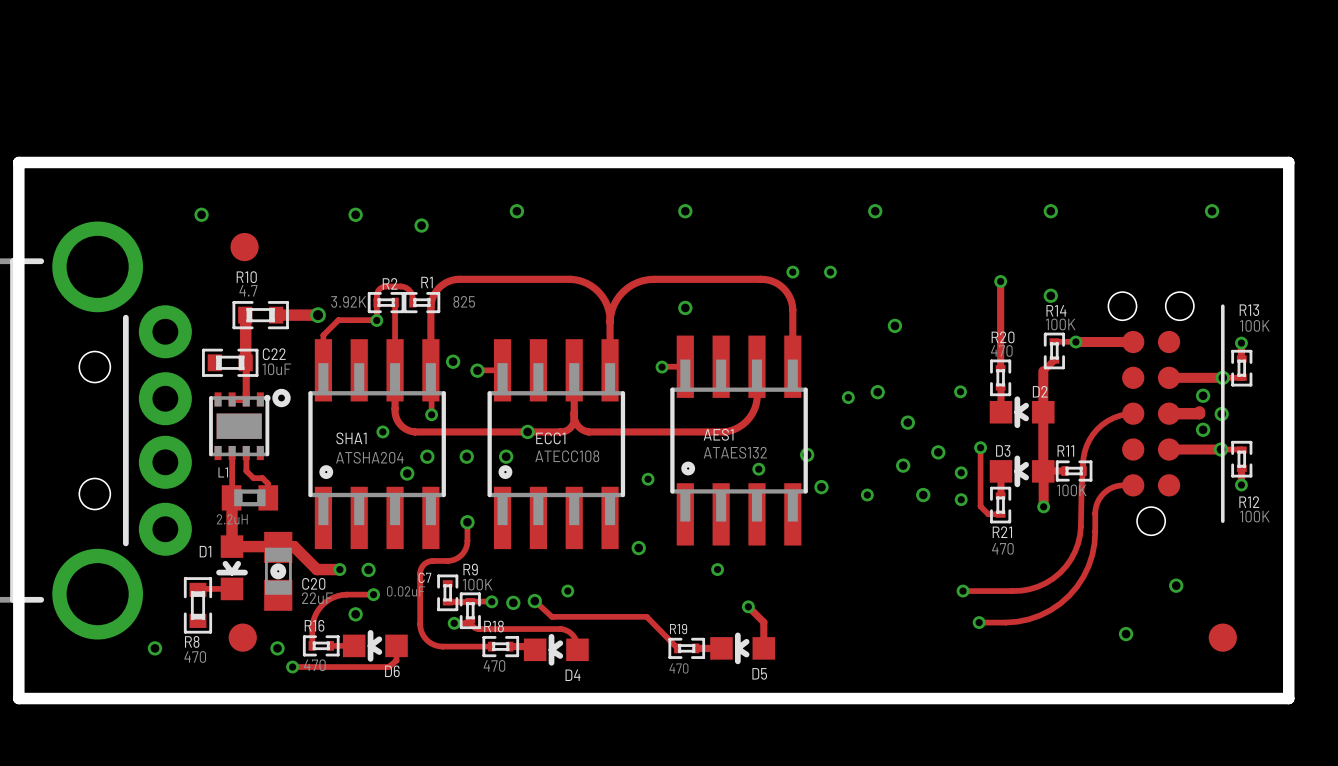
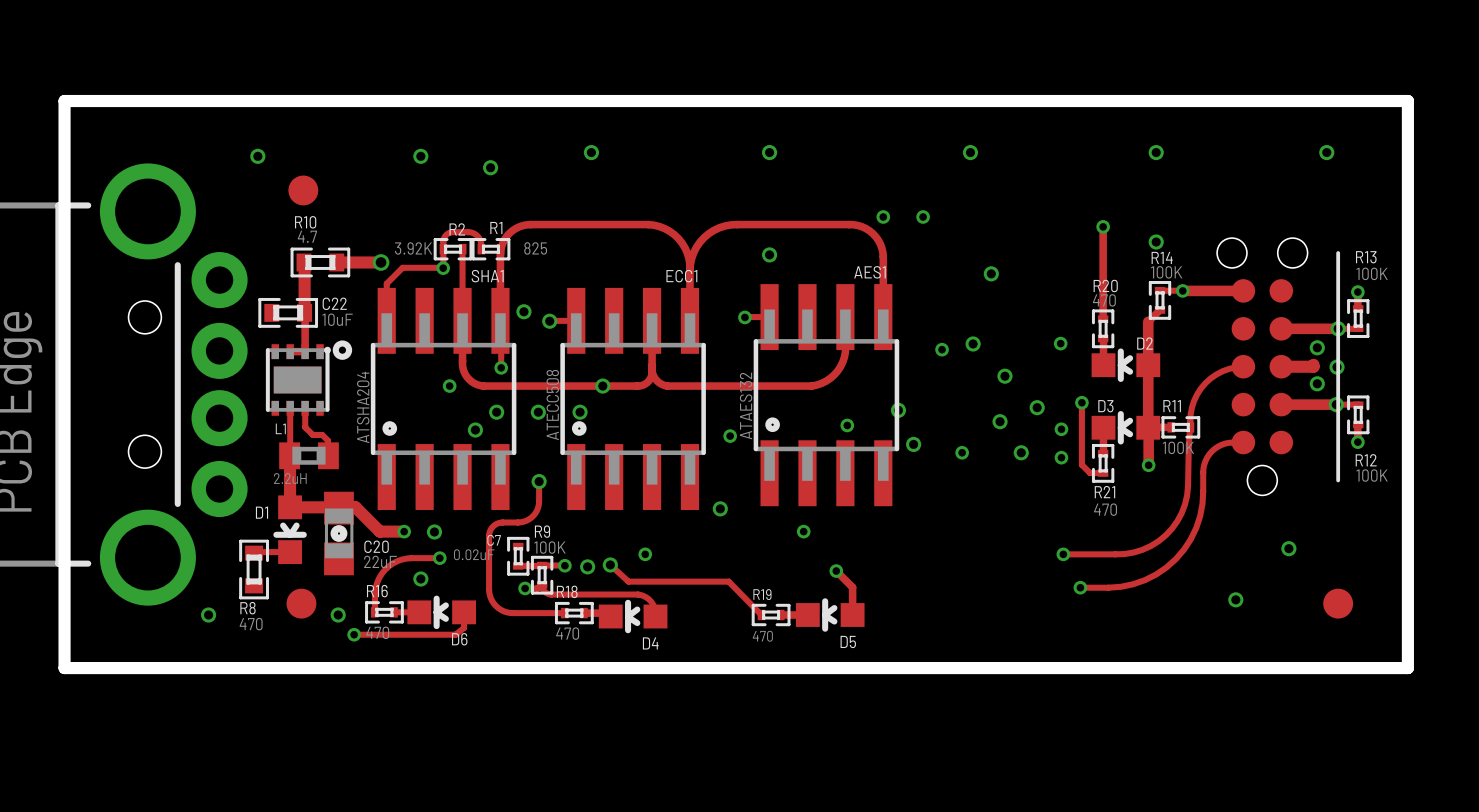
AES1 name position: AES1 (718, 434) -> AES1 (869, 272)
SHA1 name position: SHA1 (351, 438) -> SHA1 (487, 276)
ECC1 name position: ECC1 (550, 438) -> ECC1 (681, 276)
AES1 value rotation: 0° (735, 452) -> 90° counterclockwise (746, 405)
ECC1 value: ATECC108 (567, 456) -> ATECC508 (552, 405)
SHA1 value rotation: 0° (369, 457) -> 90° counterclockwise (363, 407)

